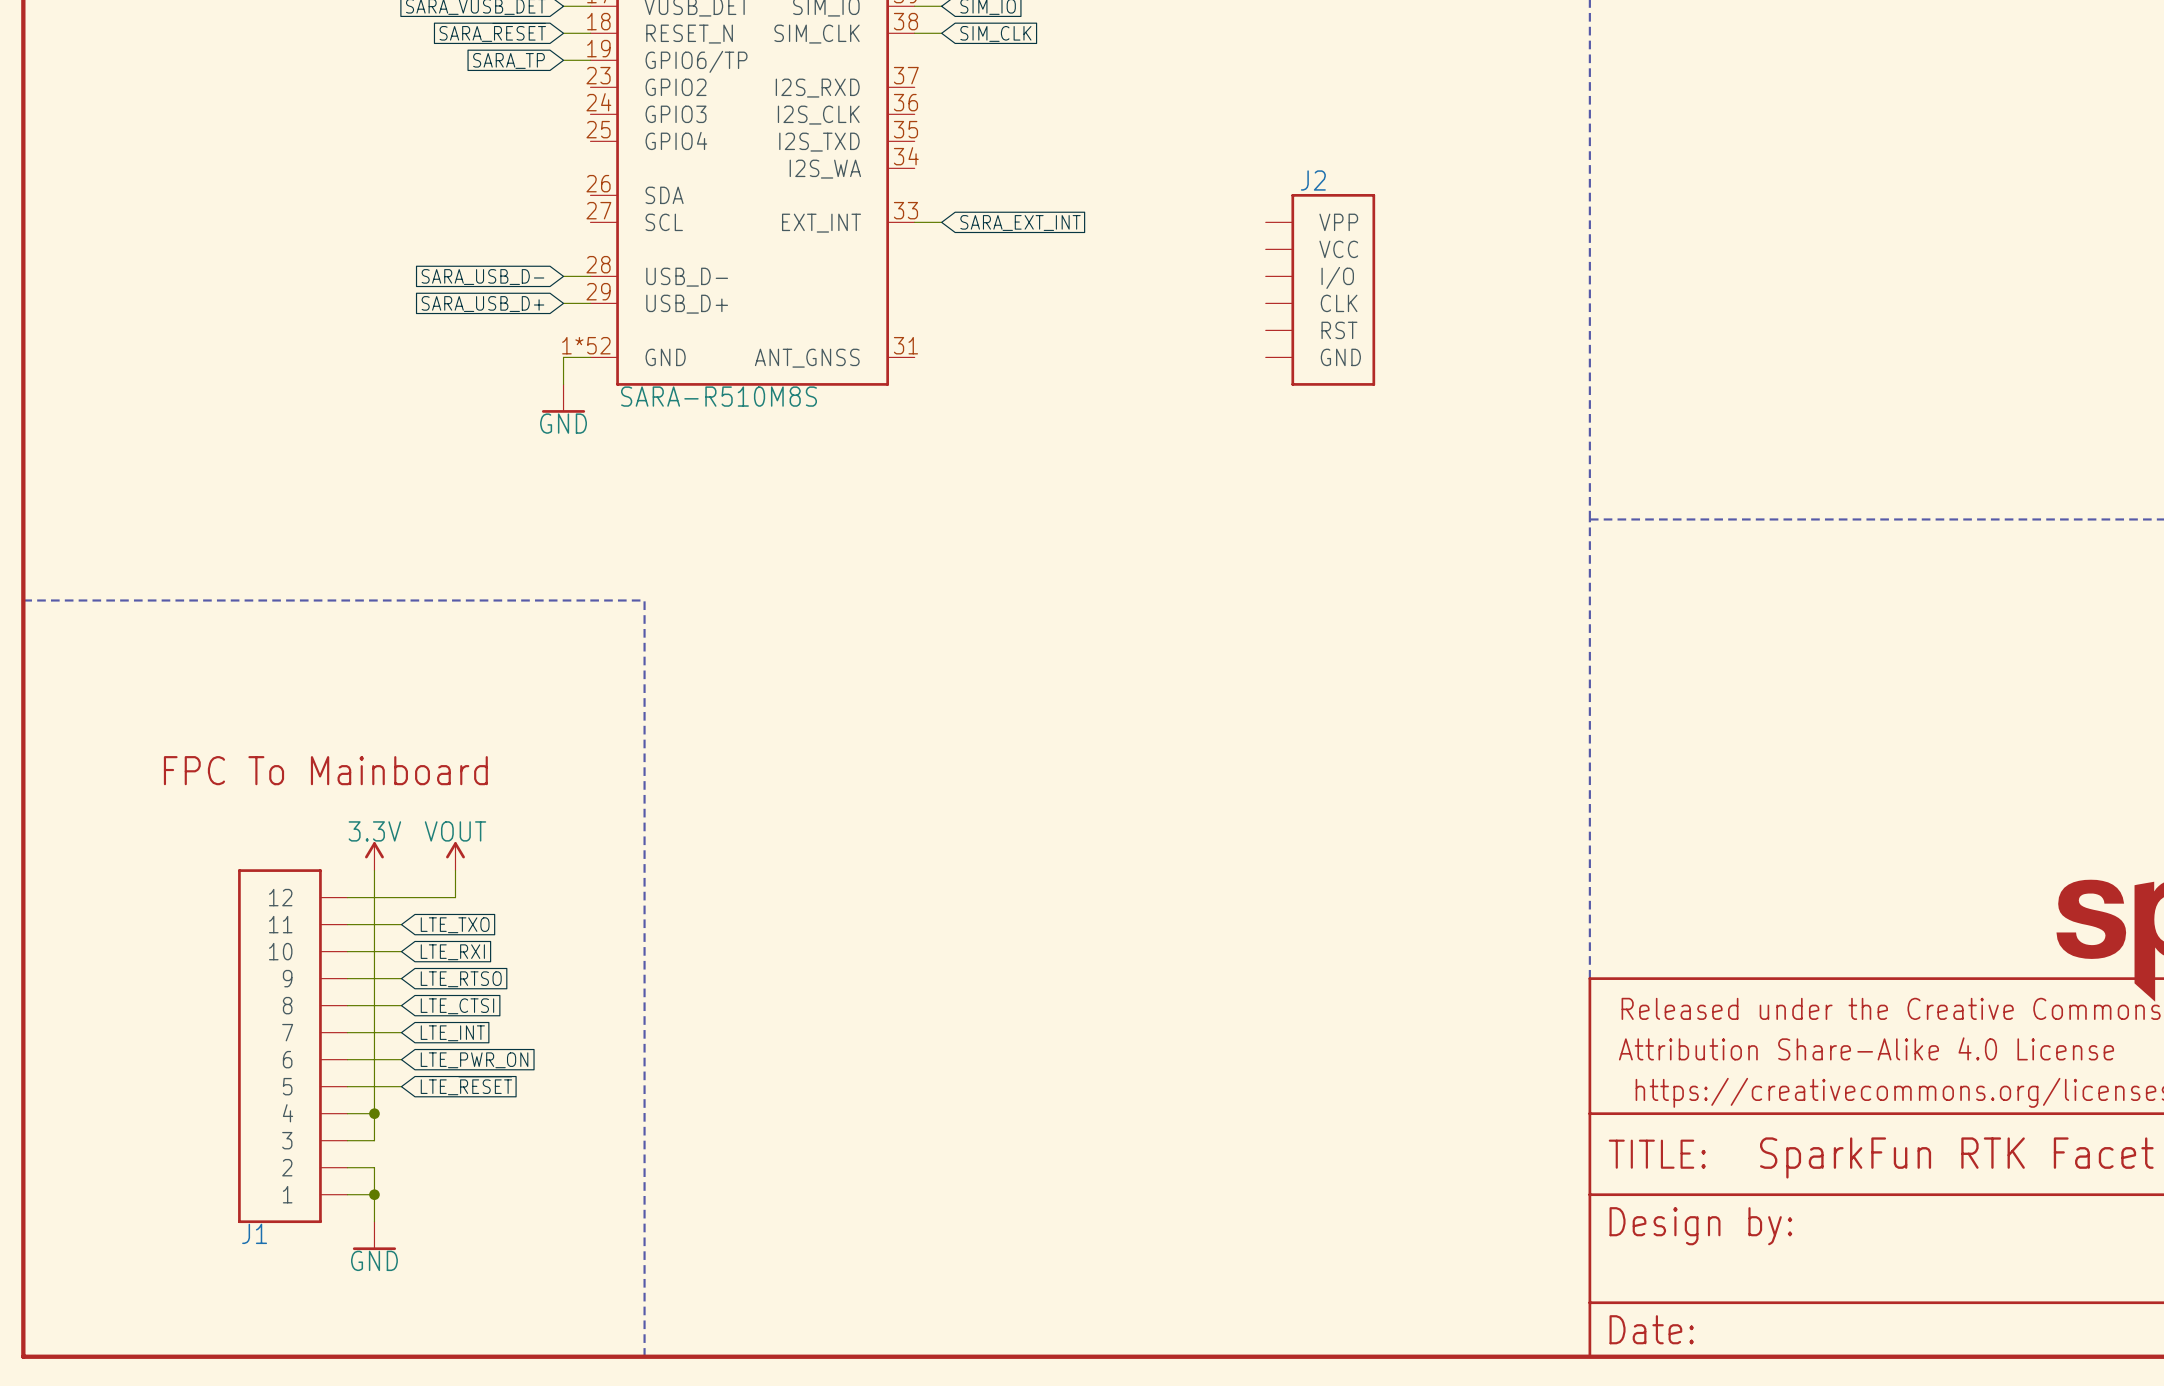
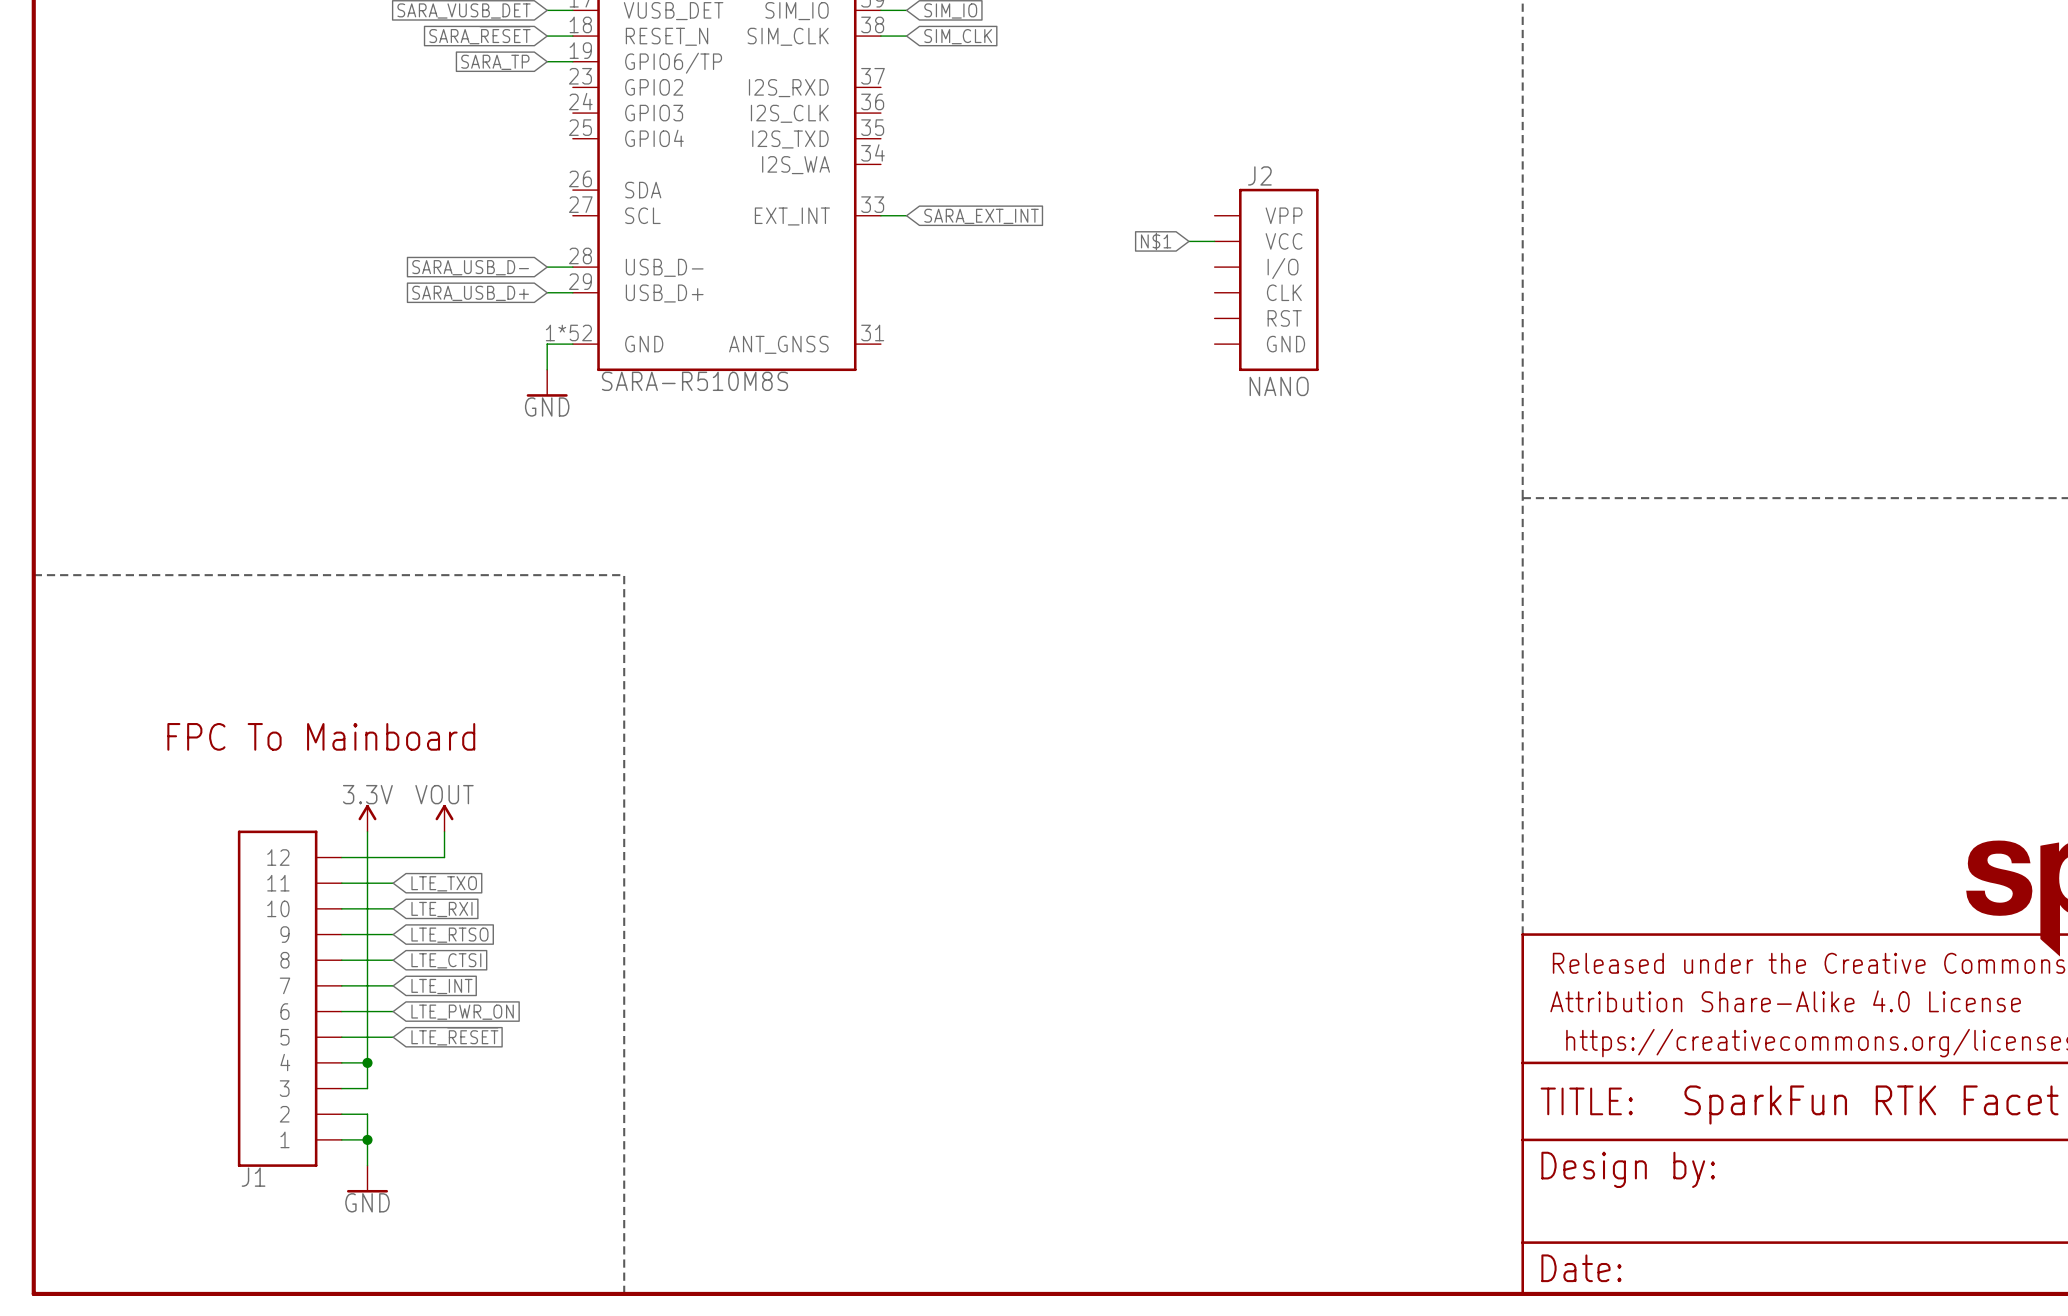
global label: none -> N$1 (1156, 241)
wire: none -> (1188, 241) (1214, 241)
J2 value: none -> NANO (1279, 386)

